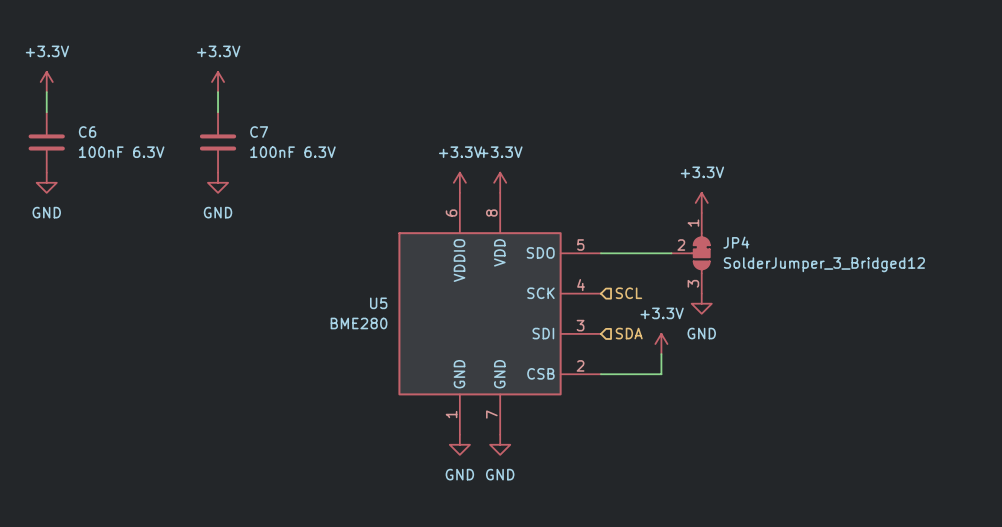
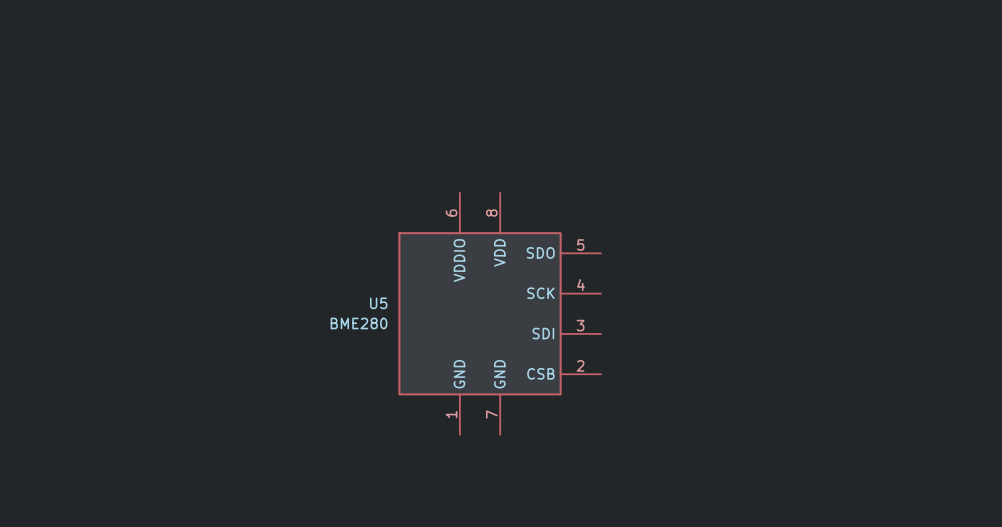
power symbol: +3.3V (46, 82) -> none
power symbol: +3.3V (218, 82) -> none
wire: (46, 92) (46, 112) -> none
wire: (218, 92) (218, 112) -> none
C6: 100nF 6.3V (46, 142) -> none
C7: 100nF 6.3V (218, 142) -> none
power symbol: GND (46, 182) -> none
power symbol: GND (218, 182) -> none
power symbol: +3.3V (459, 182) -> none
power symbol: +3.3V (500, 182) -> none
power symbol: +3.3V (701, 202) -> none
wire: (600, 253) (671, 253) -> none
JP4: SolderJumper_3_Bridged12 (690, 253) -> none
hierarchical label: SCL (628, 293) -> none
power symbol: GND (701, 303) -> none
hierarchical label: SDA (629, 333) -> none
power symbol: +3.3V (661, 344) -> none
wire: (661, 354) (661, 374) (600, 374) -> none
power symbol: GND (459, 444) -> none
power symbol: GND (500, 444) -> none

